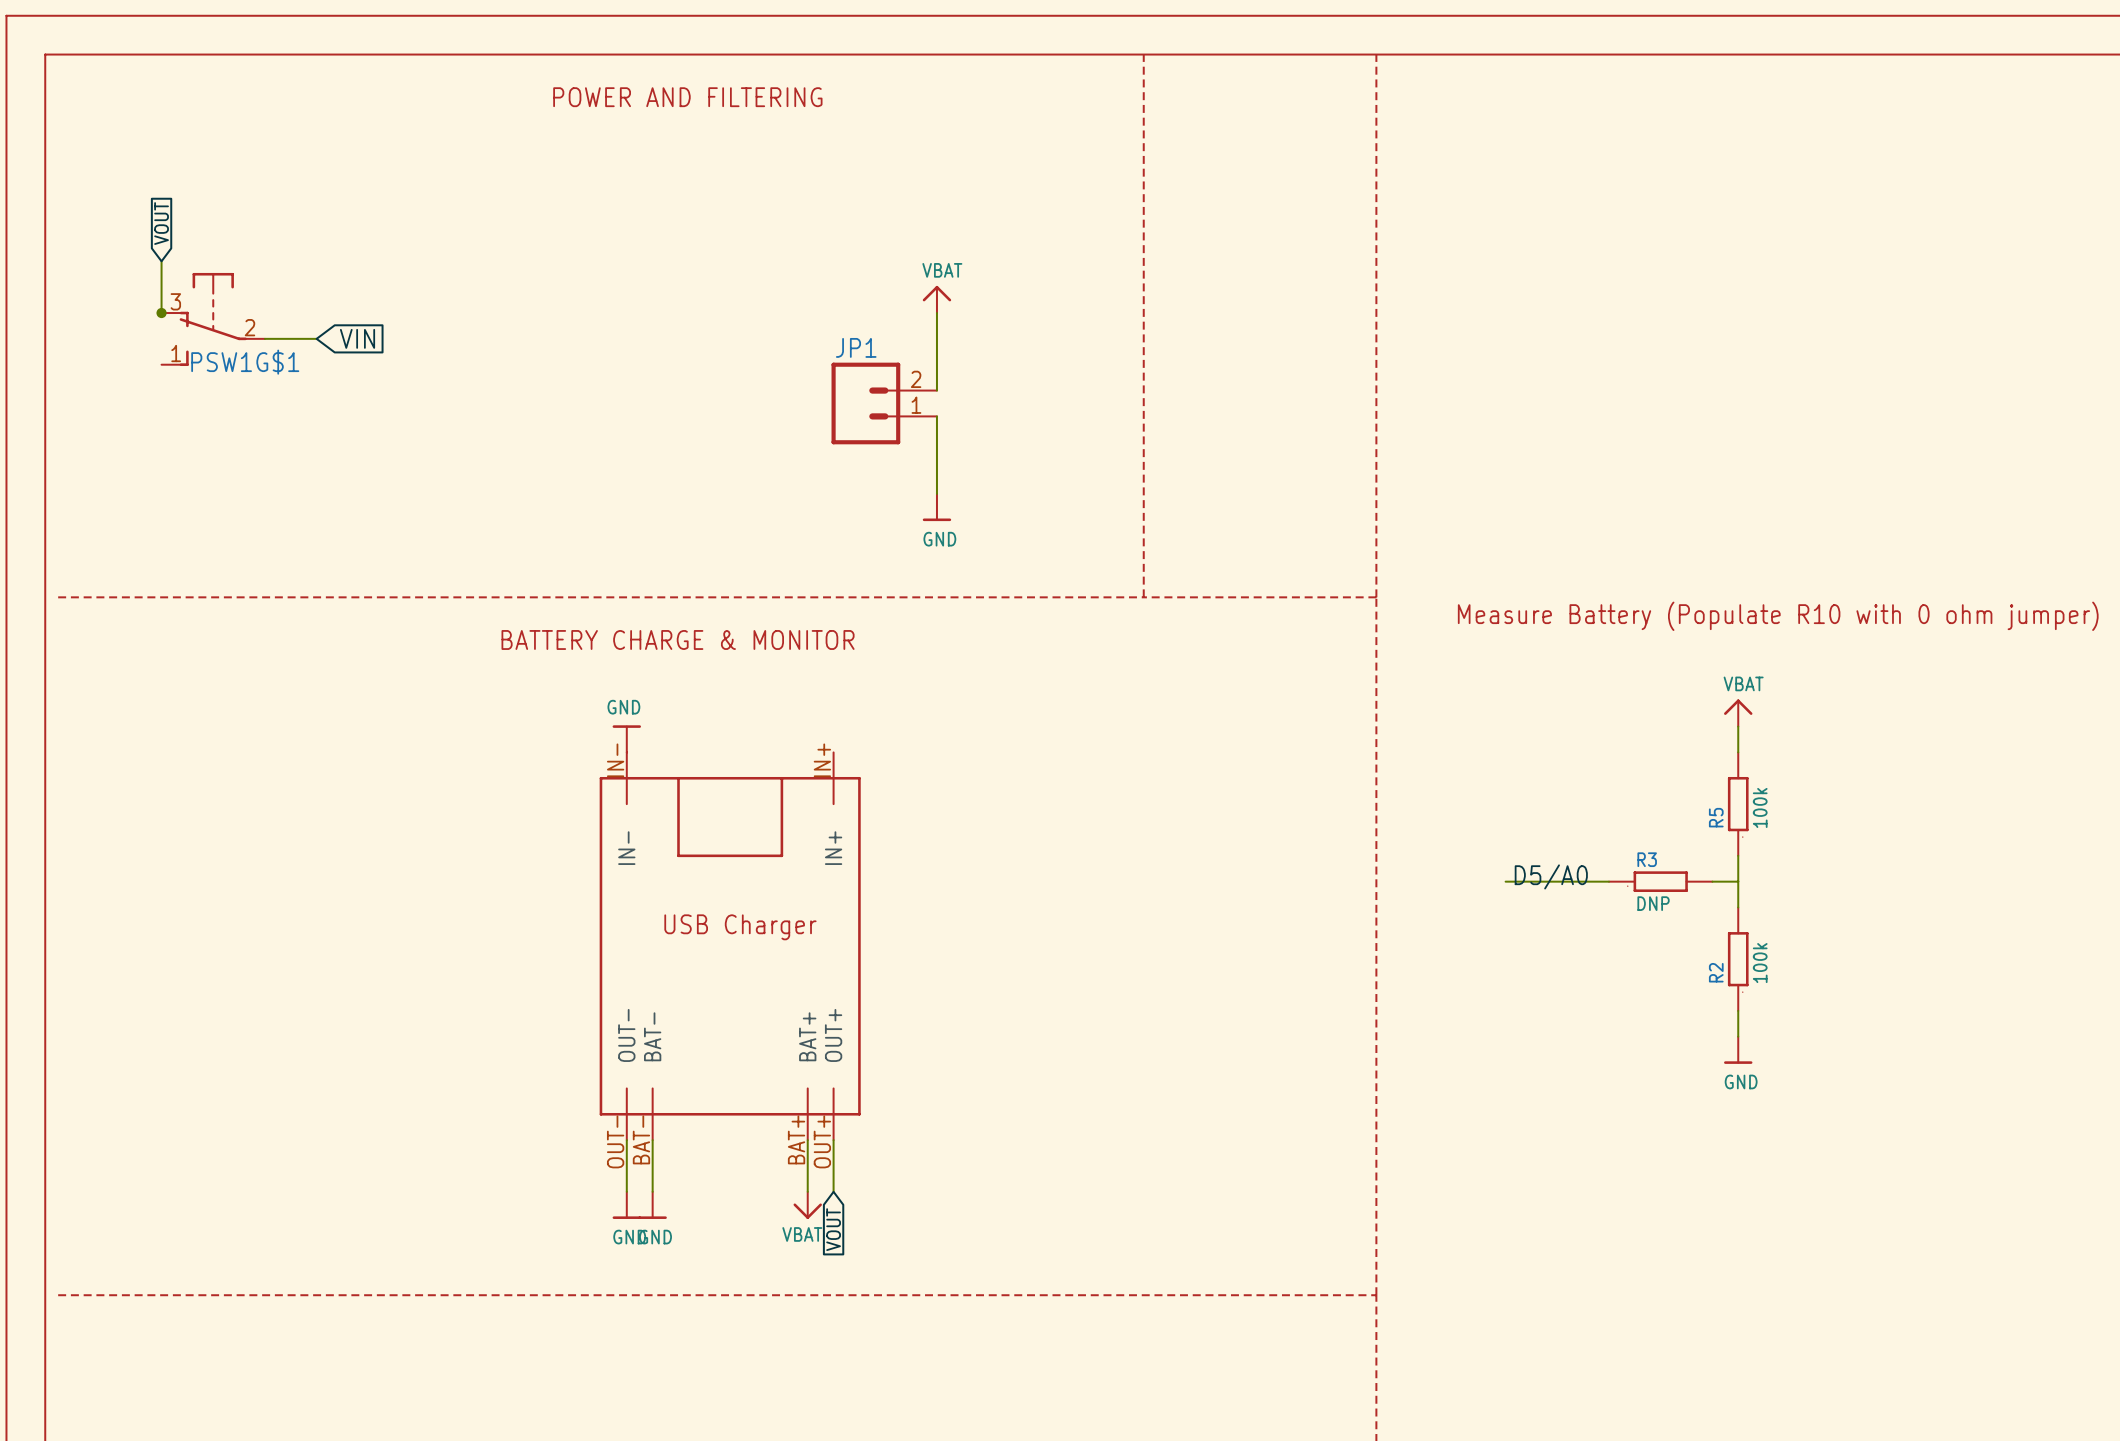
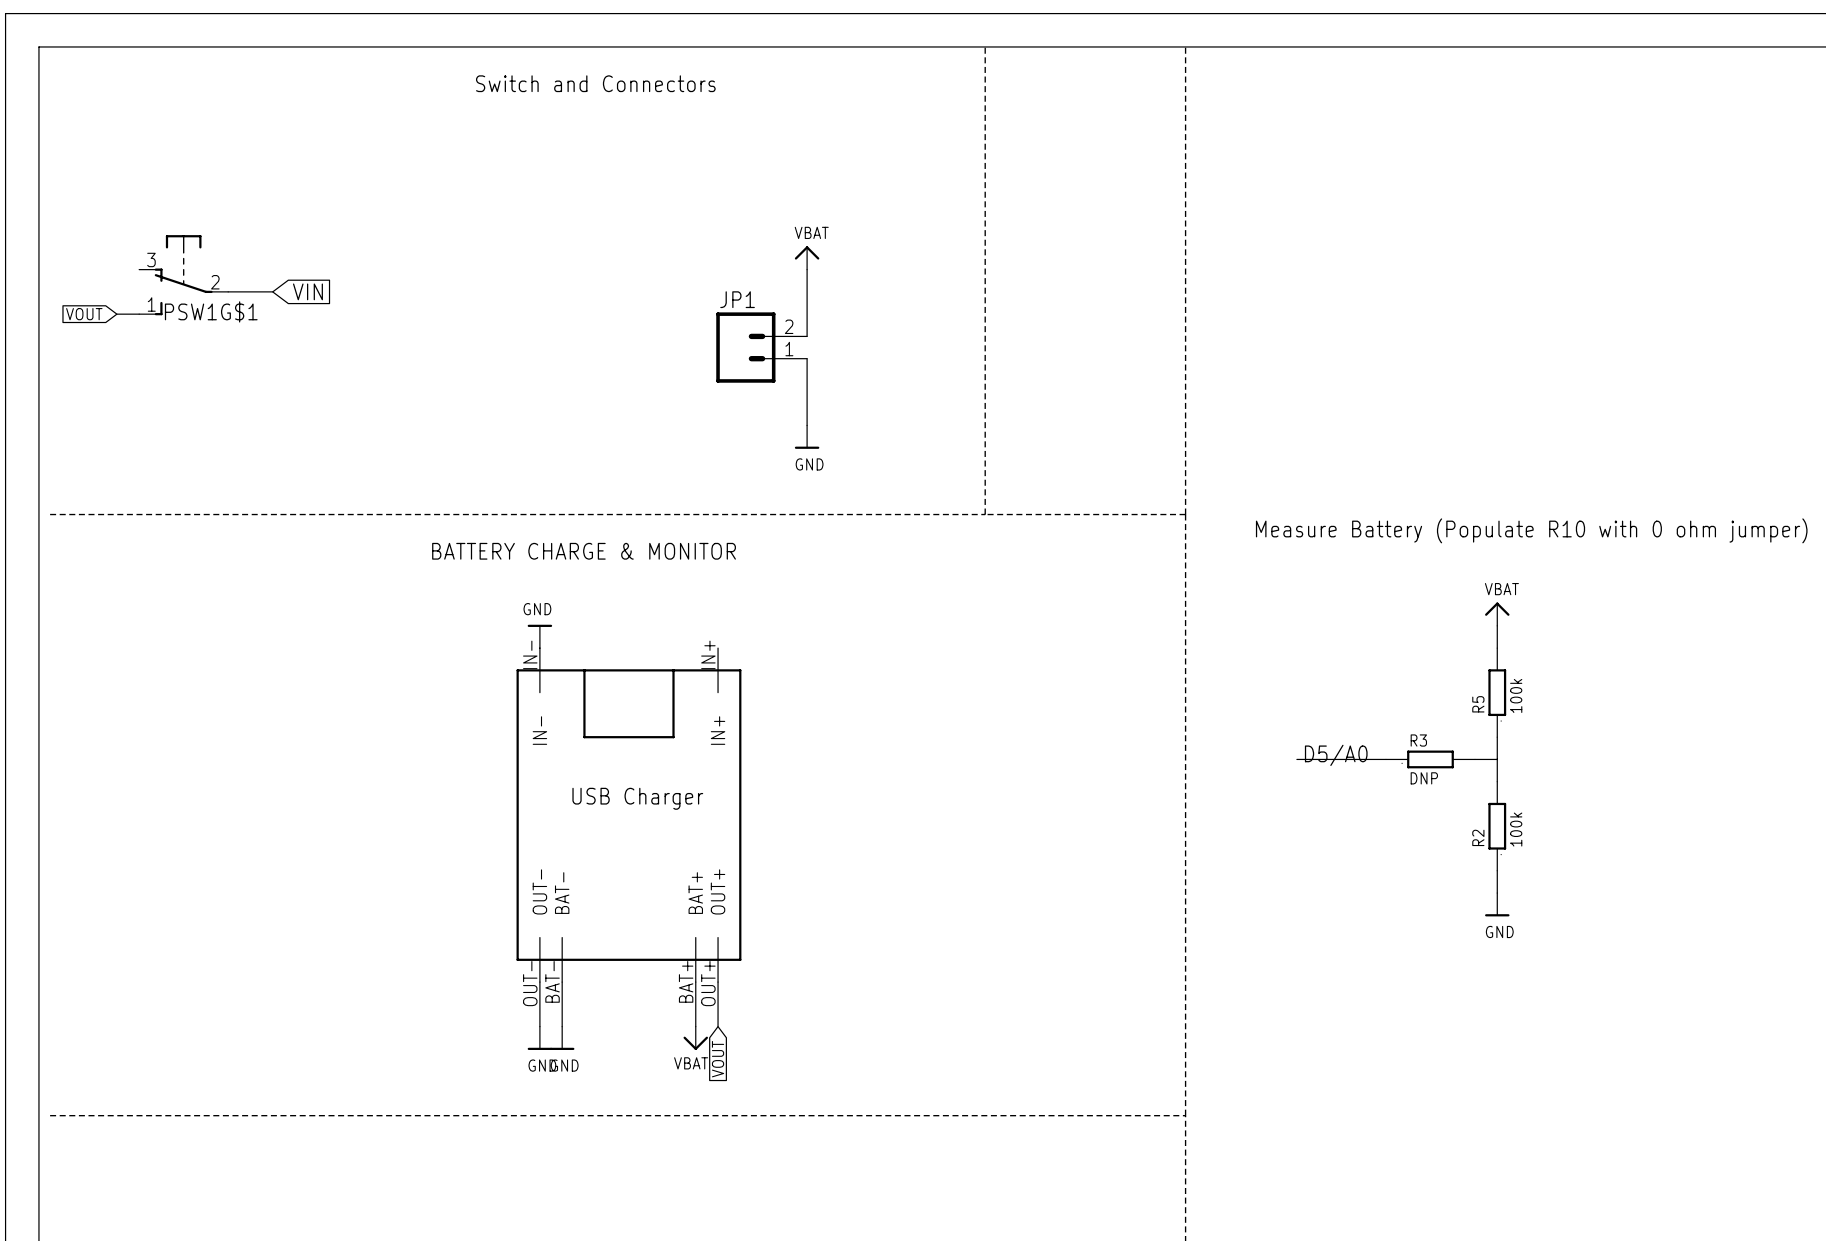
text: POWER AND FILTERING (687, 97) -> Switch and Connectors (595, 83)
global label rotation: 0° (161, 223) -> 90° counterclockwise (84, 314)
global label position: VOUT (161, 223) -> VOUT (84, 314)
wire: (161, 261) (161, 313) -> none
junction: (161, 313) -> none
wire: none -> (116, 314) (139, 314)

